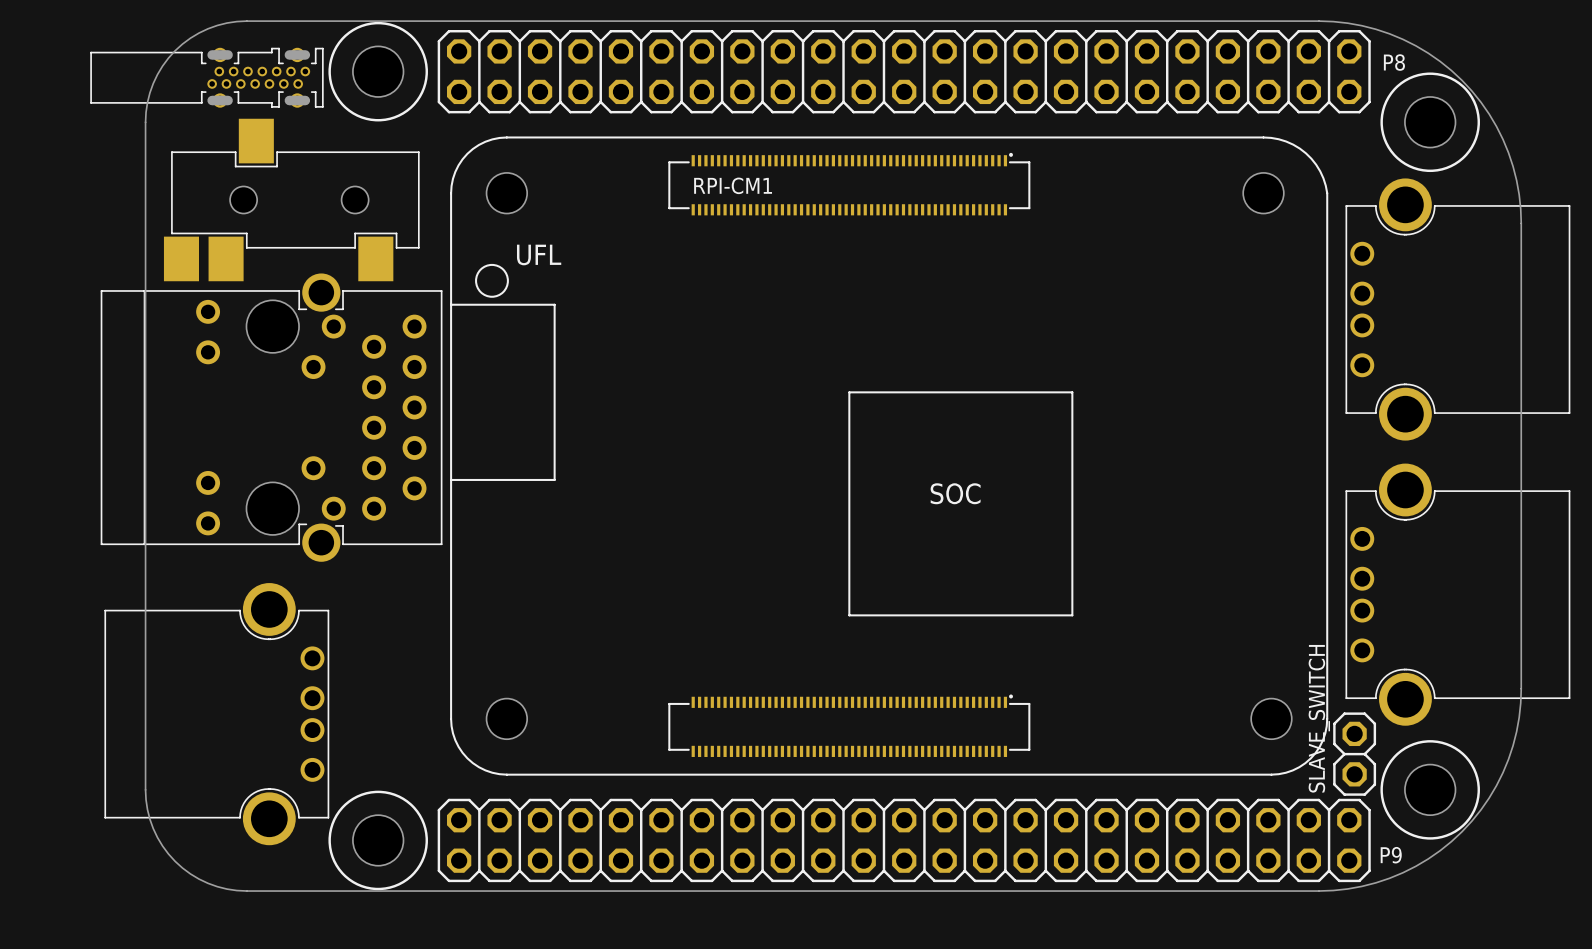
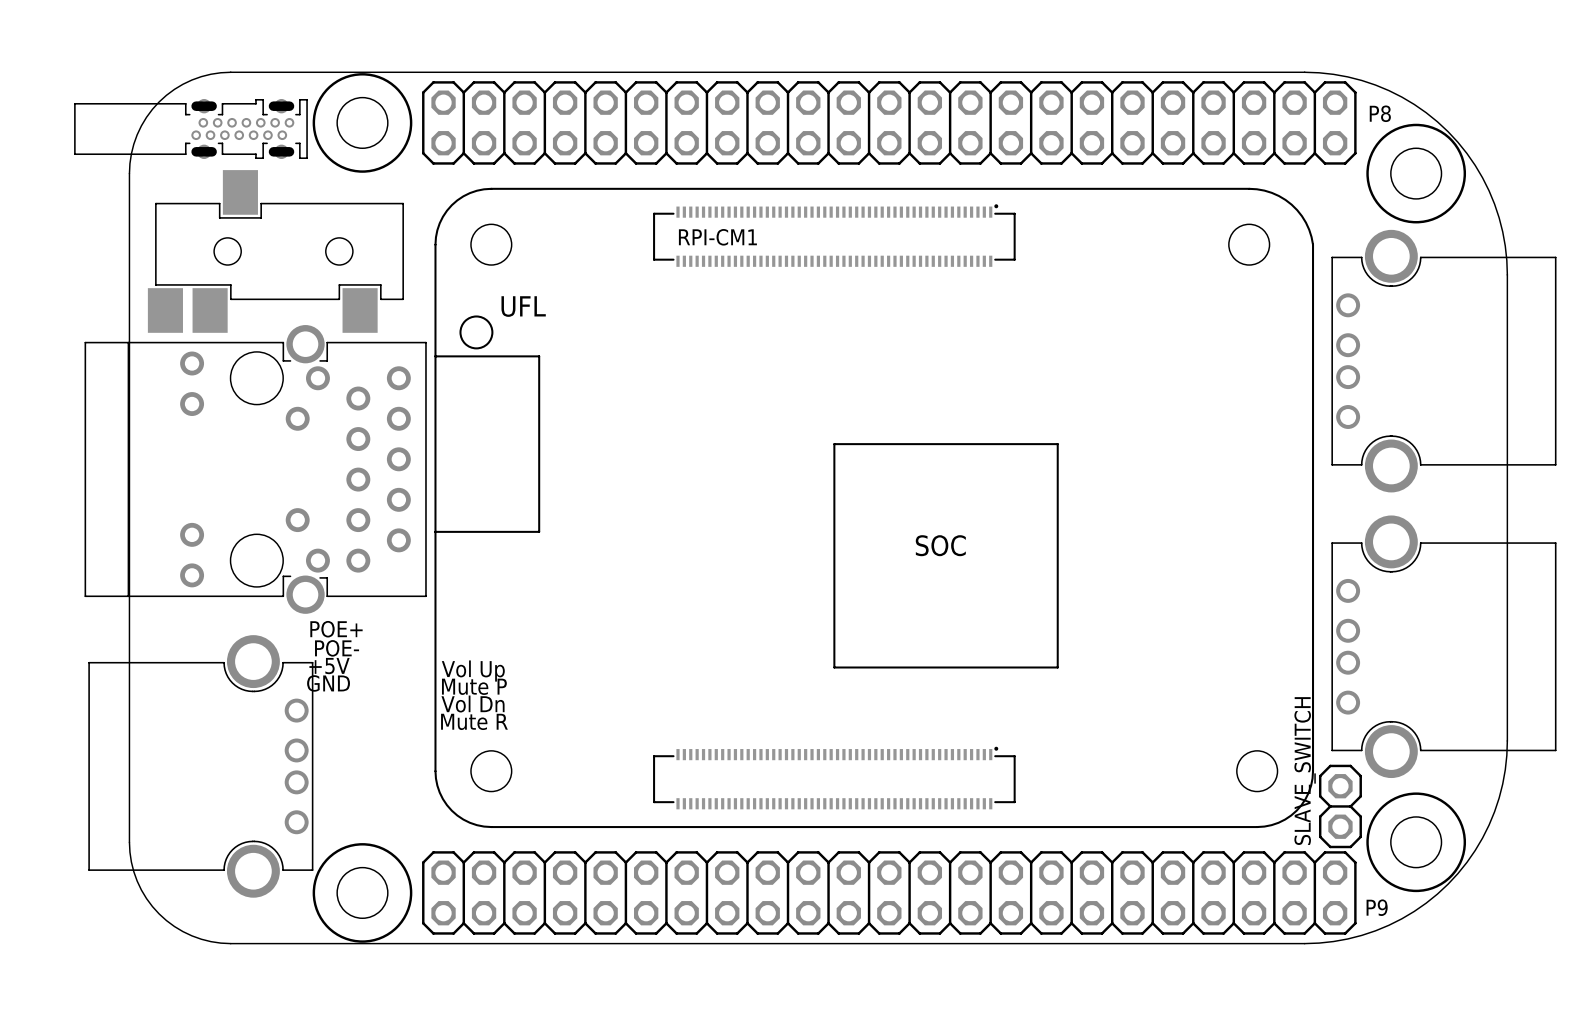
text: none -> POE+ (336, 629)
text: none -> POE- (337, 648)
text: none -> +5V (329, 666)
text: none -> Vol Up (473, 671)
text: none -> GND (328, 683)
text: none -> Mute P (474, 686)
text: none -> Vol Dn (473, 704)
text: none -> Mute R (474, 721)

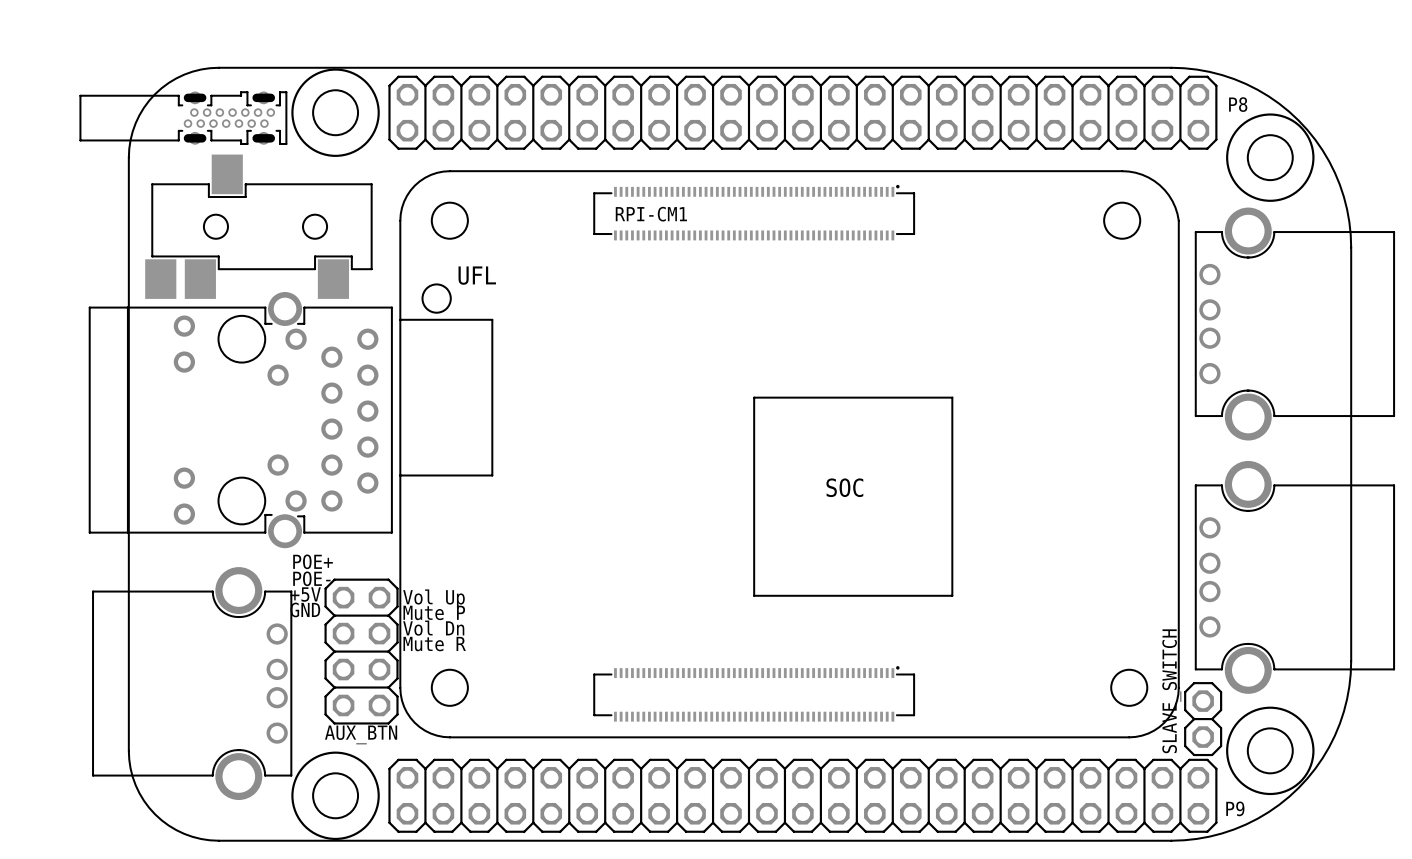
AUX_BTN: none -> (361, 651)

